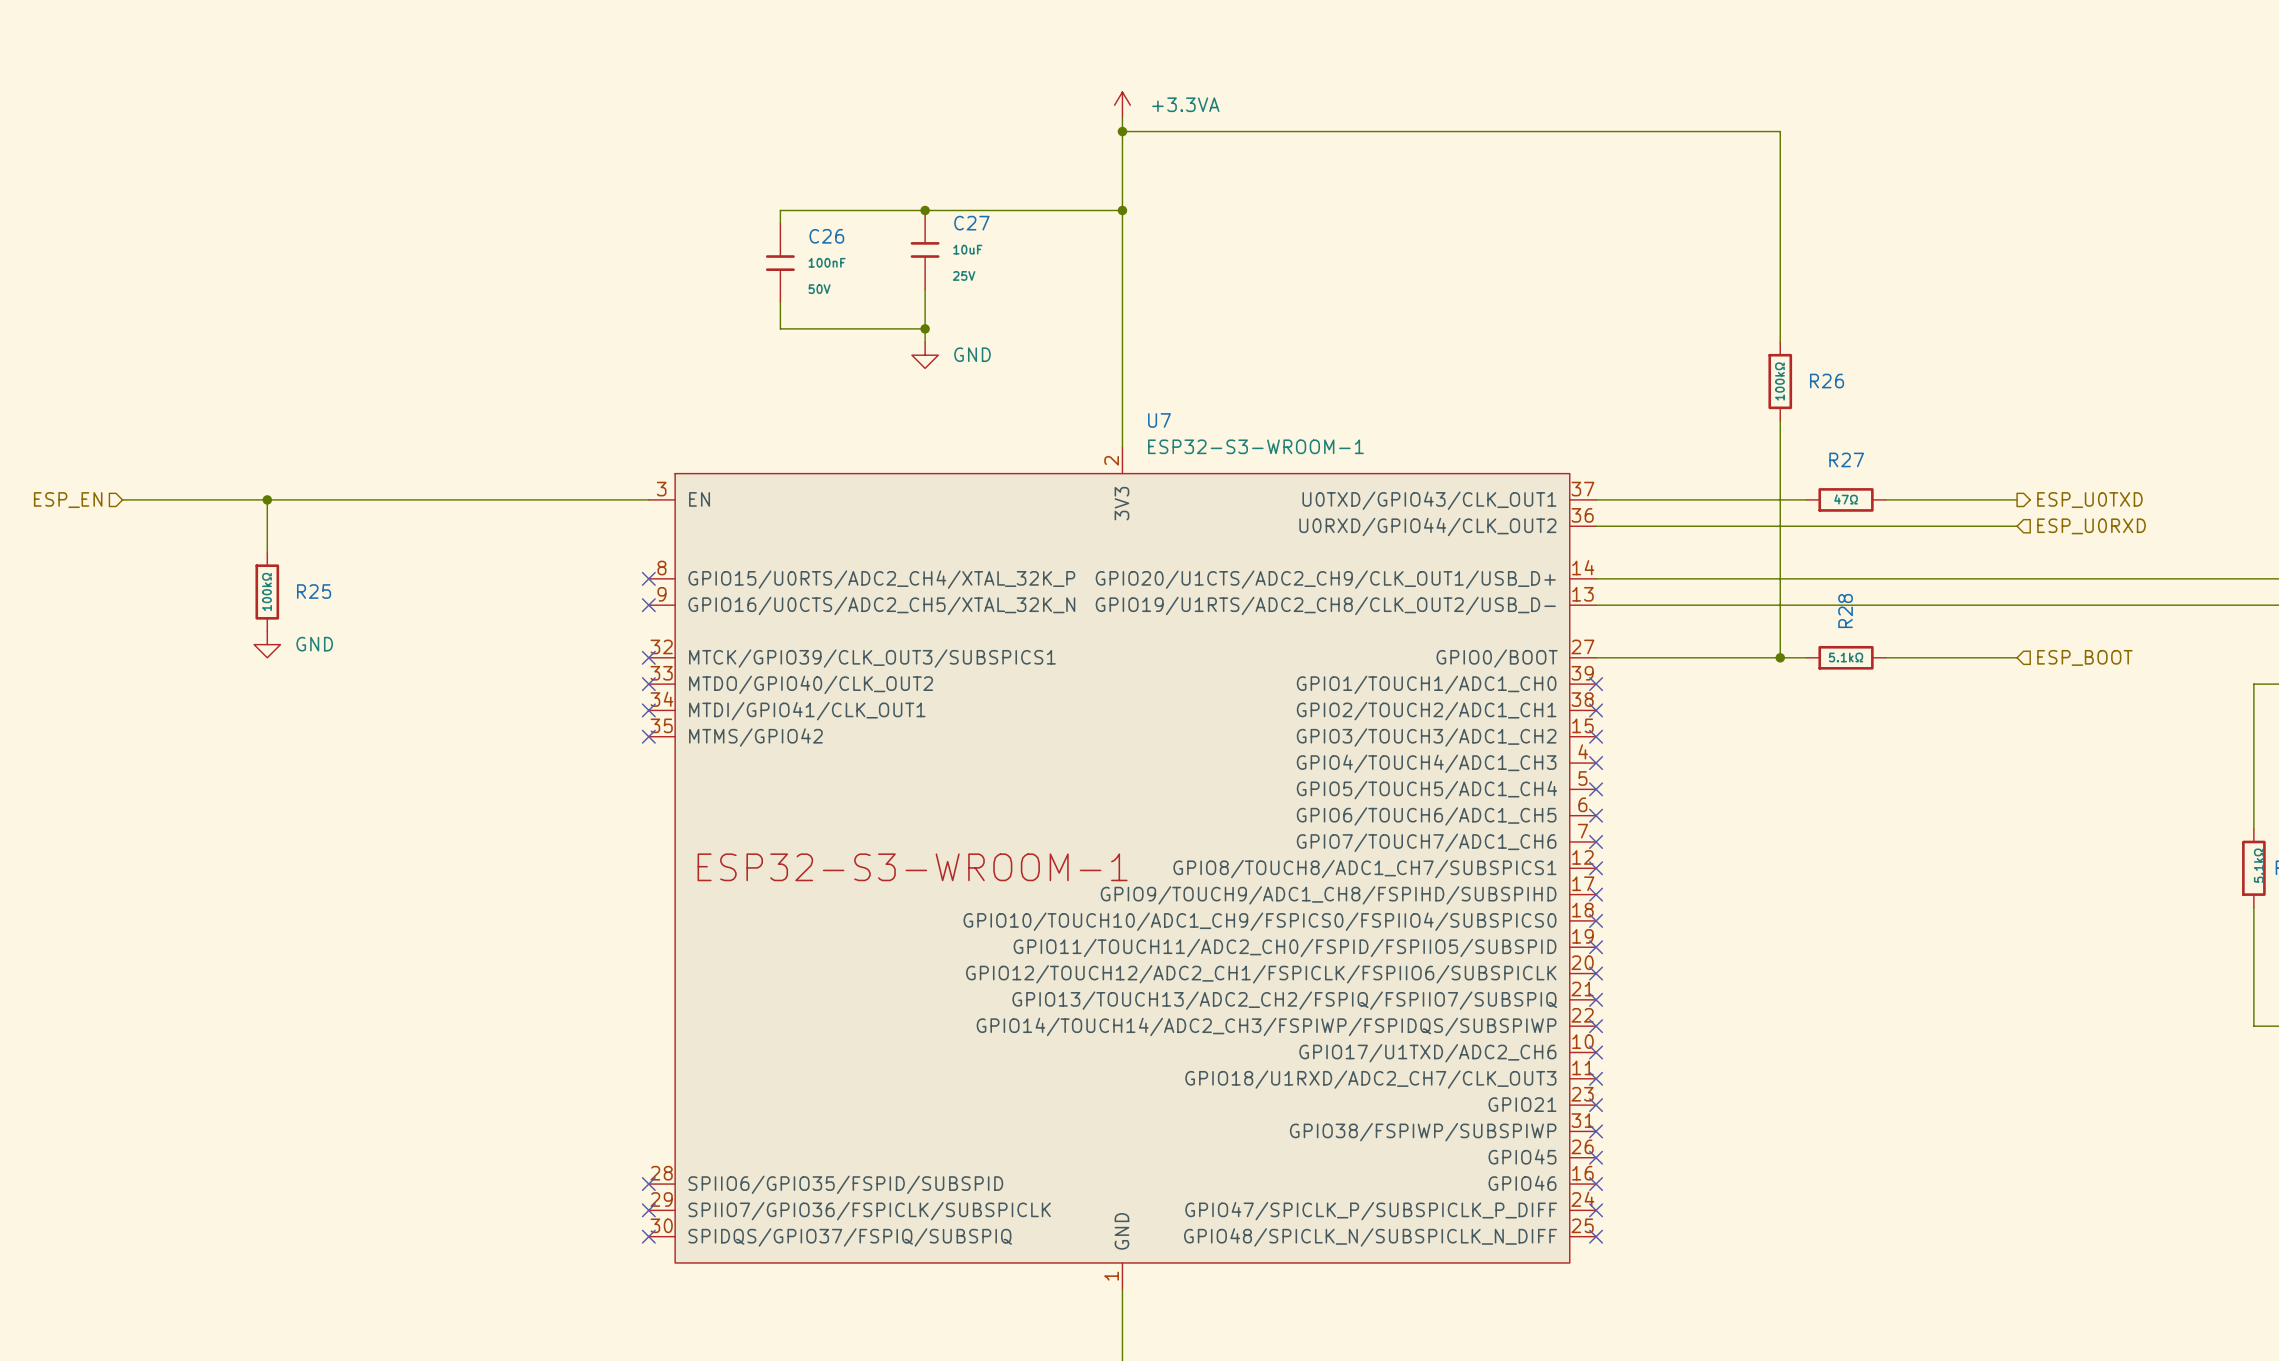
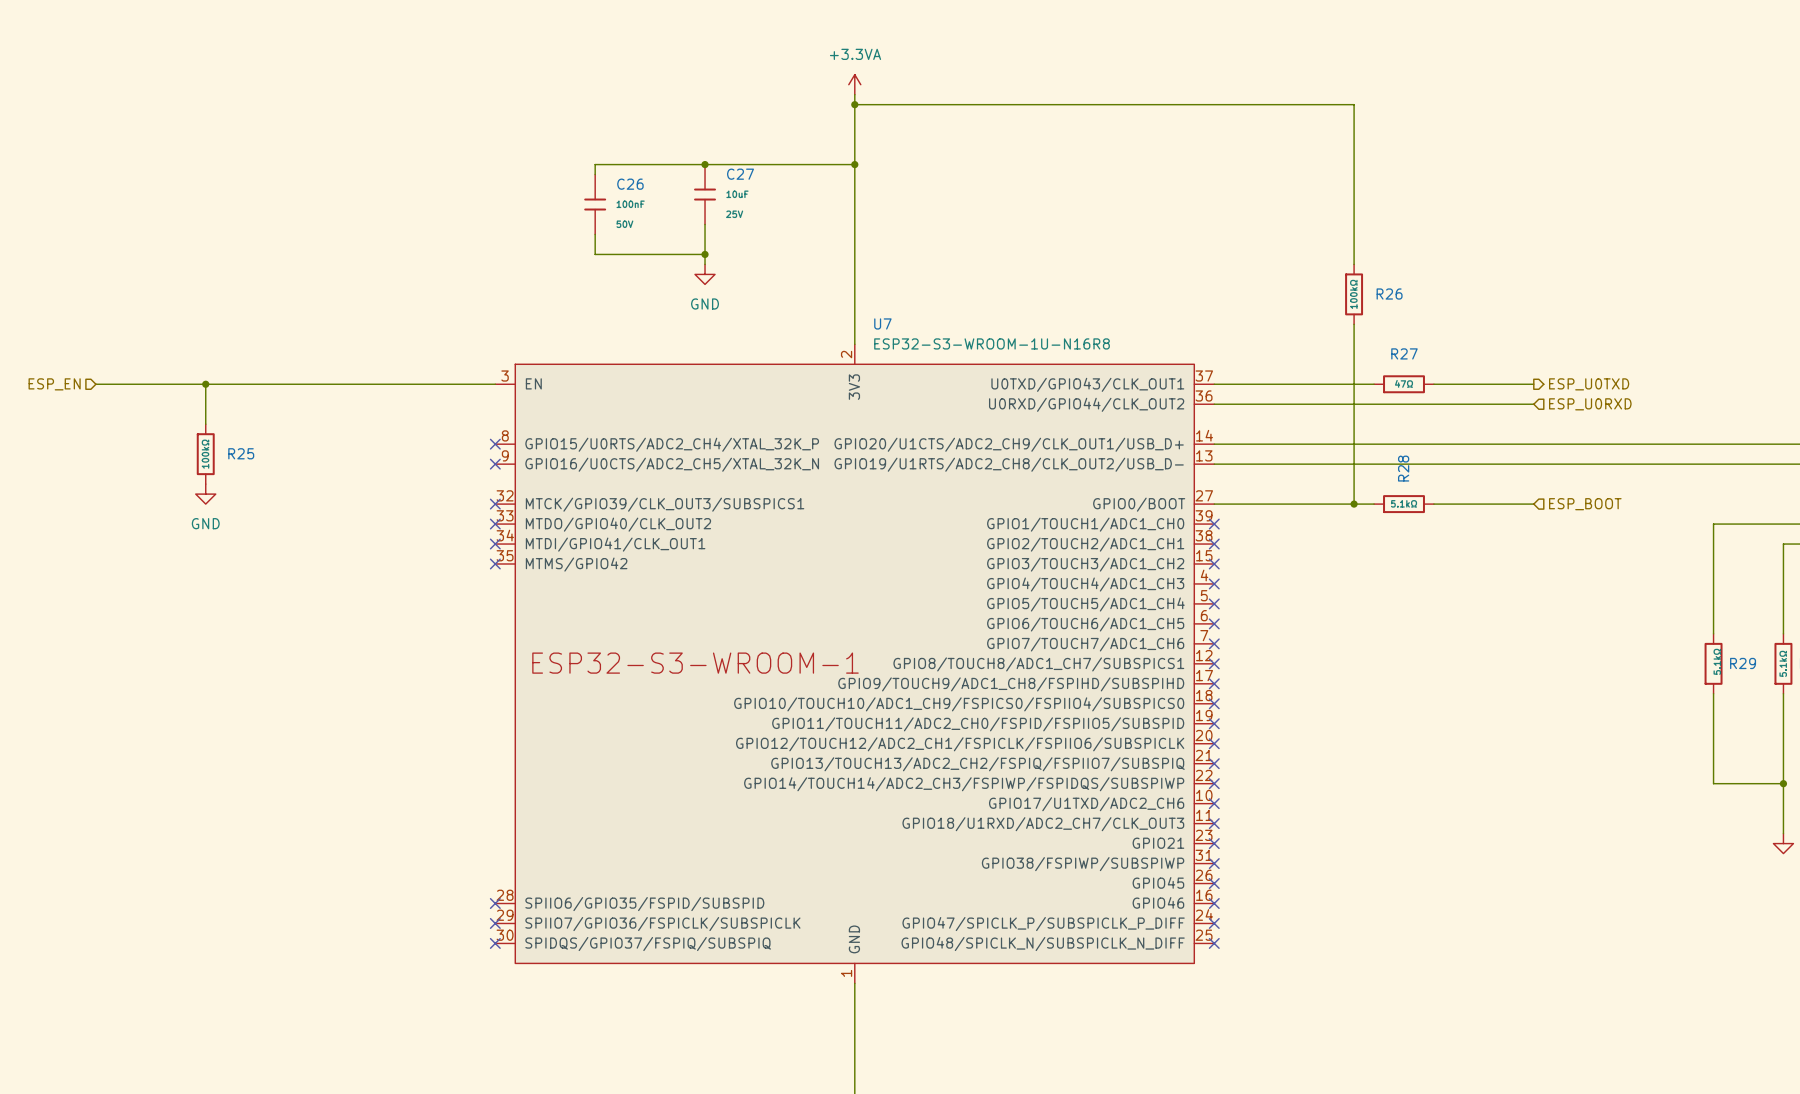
power symbol text position: +3.3VA (1185, 104) -> +3.3VA (855, 54)
power symbol text position: GND (972, 354) -> GND (705, 304)
U7 value: ESP32-S3-WROOM-1 (1255, 446) -> ESP32-S3-WROOM-1U-N16R8 (992, 343)
power symbol text position: GND (314, 644) -> GND (205, 523)

